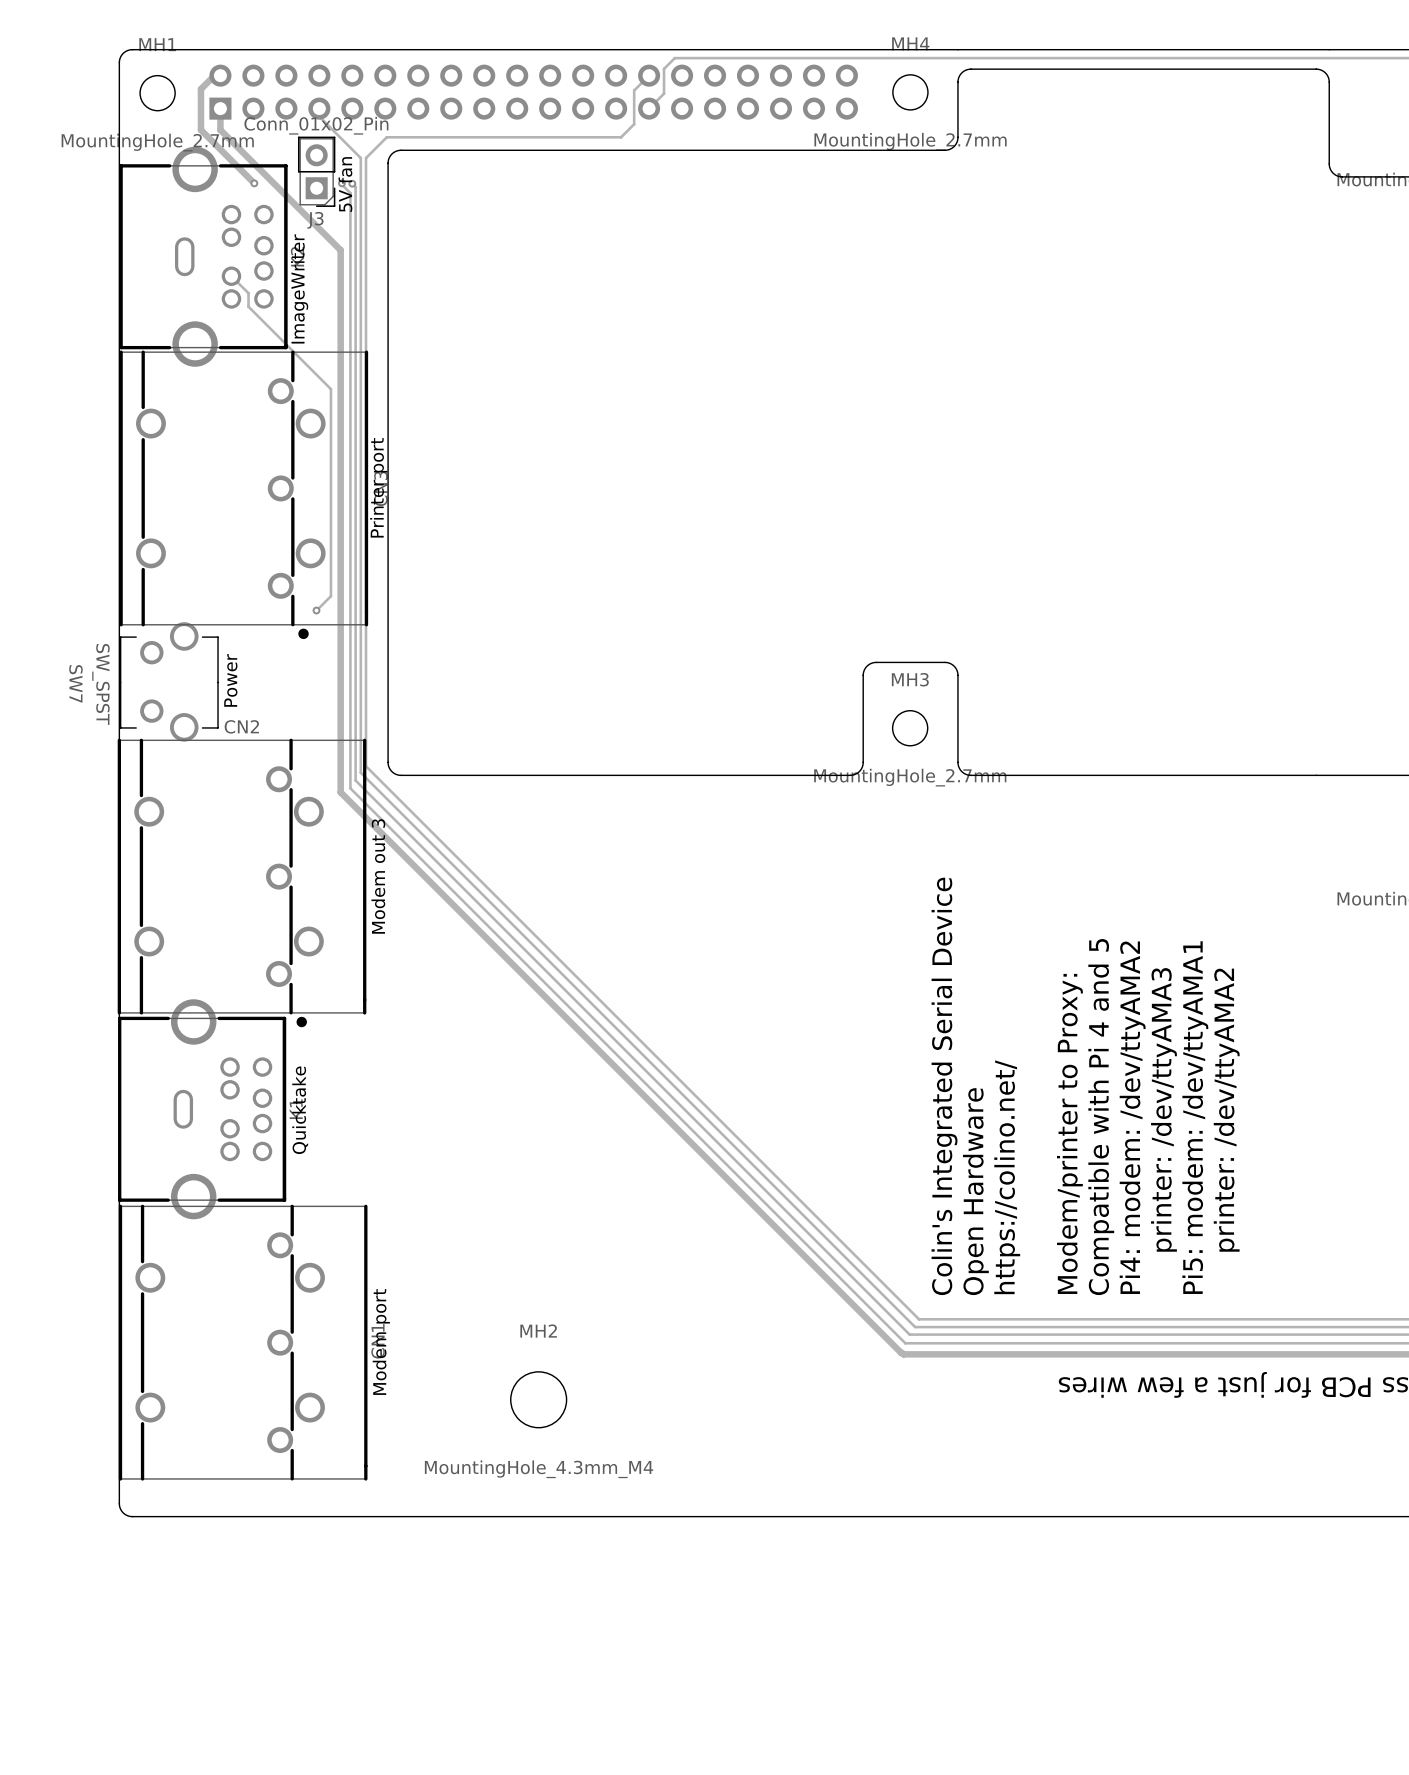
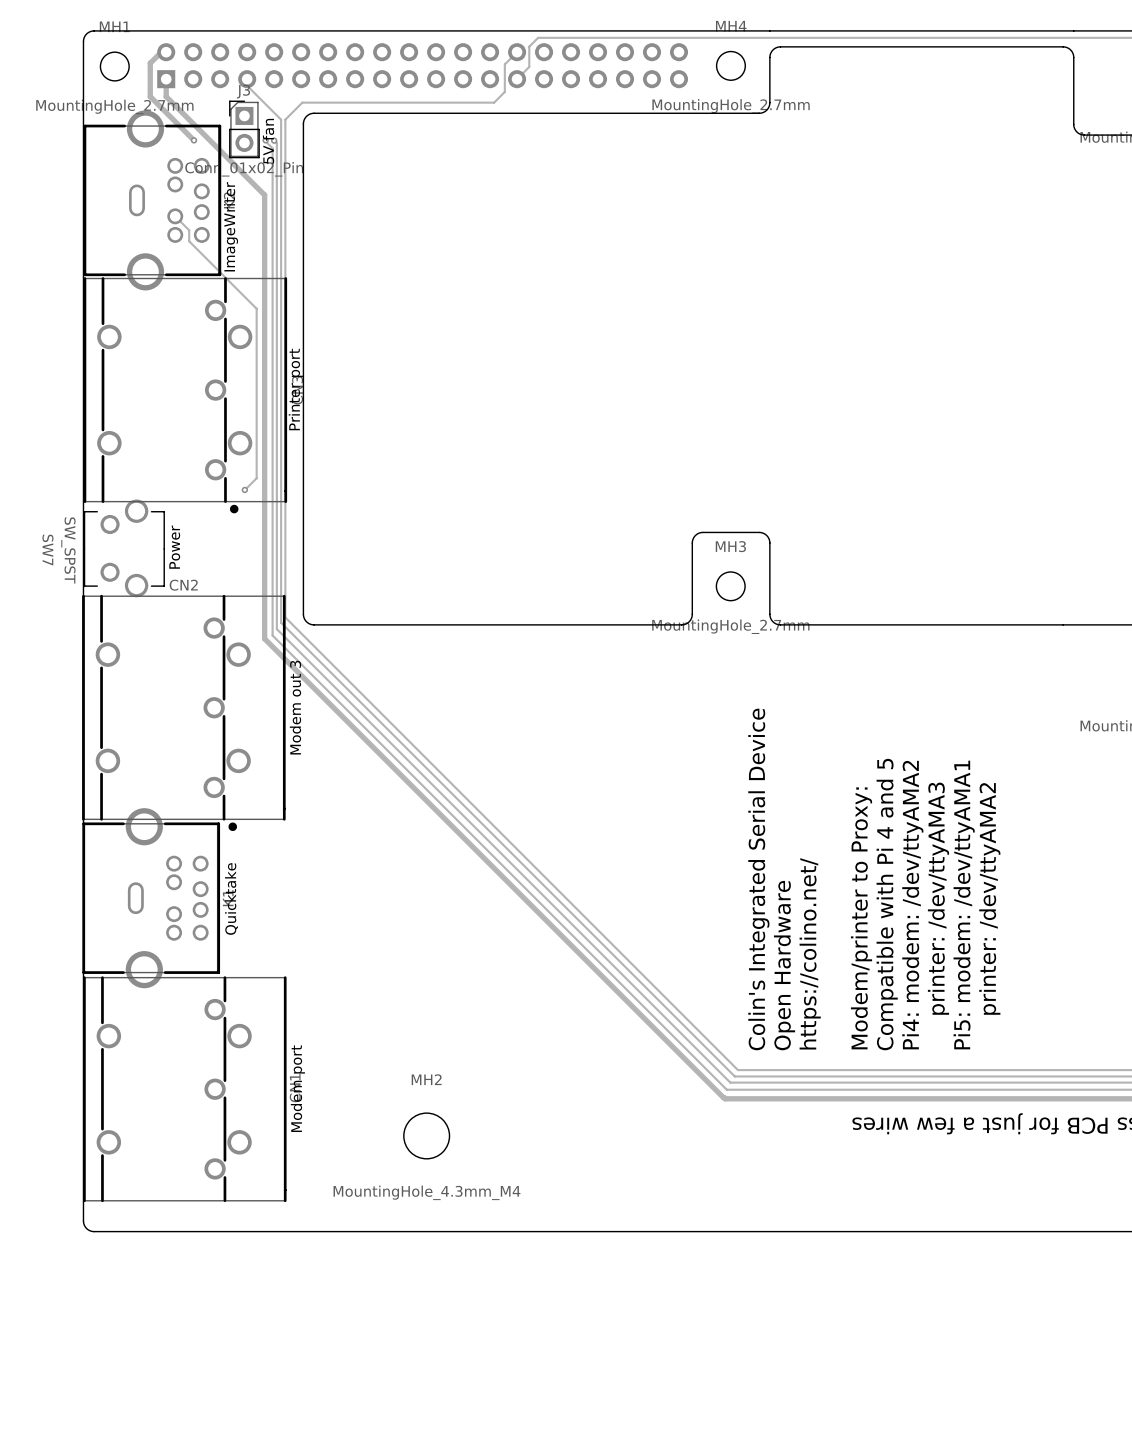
J3 rotation: 0° (316, 171) -> 180° (244, 129)

